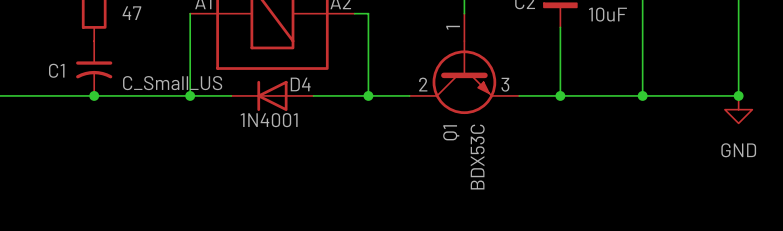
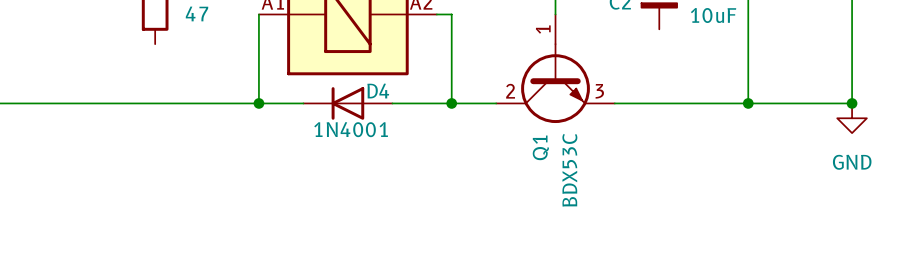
wire: (560, 27) (560, 95) -> none
C1: C_Small_US (94, 68) -> none
junction: (94, 95) -> none
junction: (560, 95) -> none

